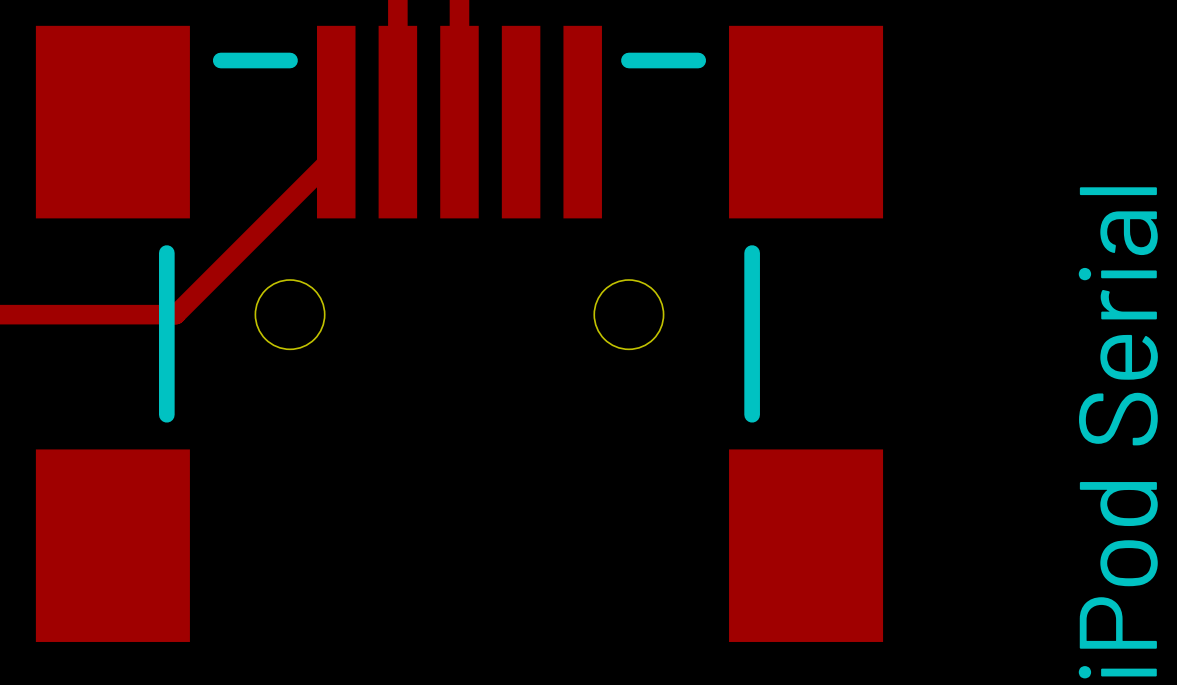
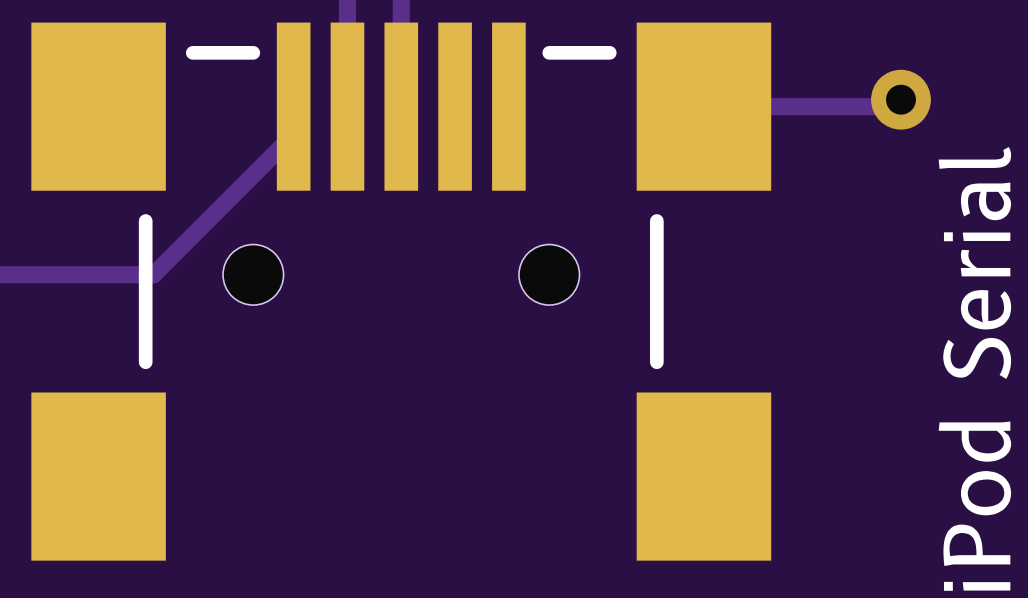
track: none -> (900, 99) (894, 106) (703, 106)
via: none -> (900, 99)

